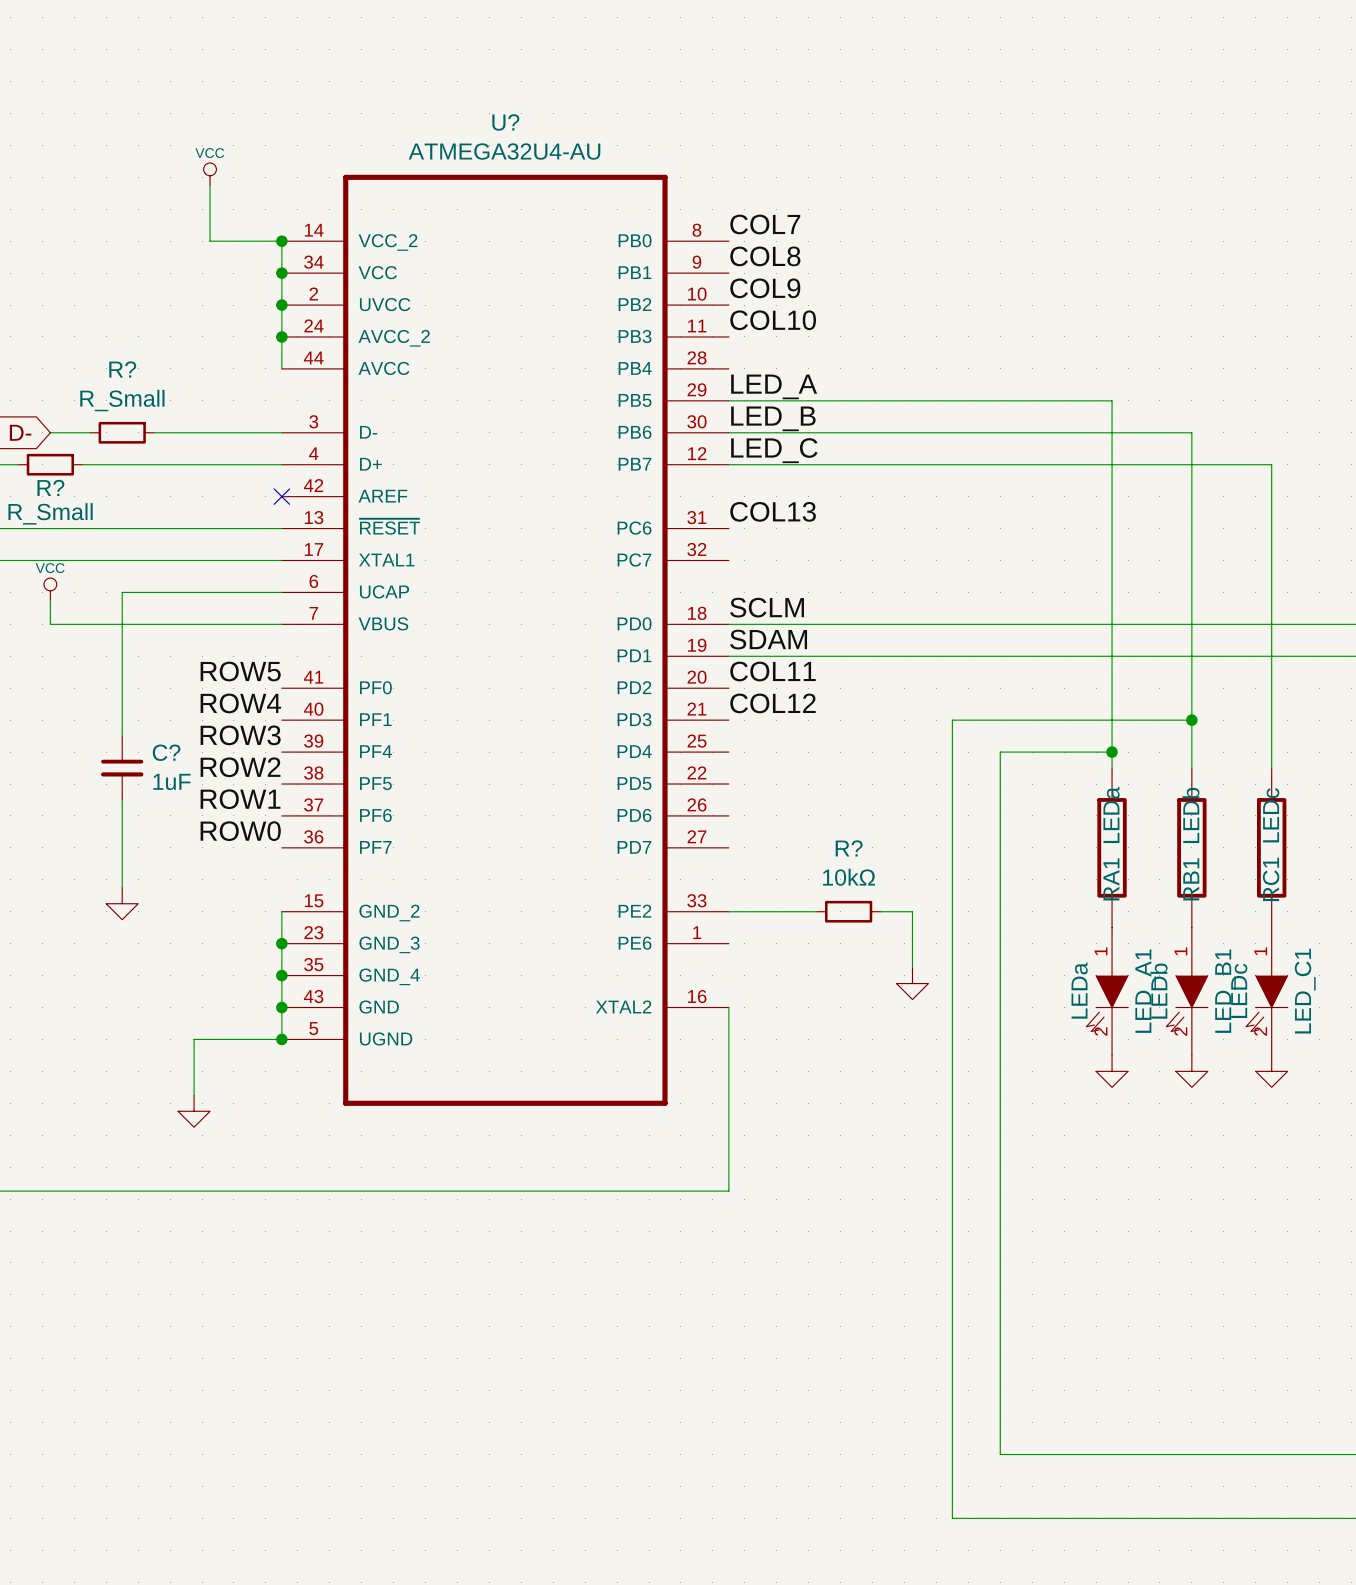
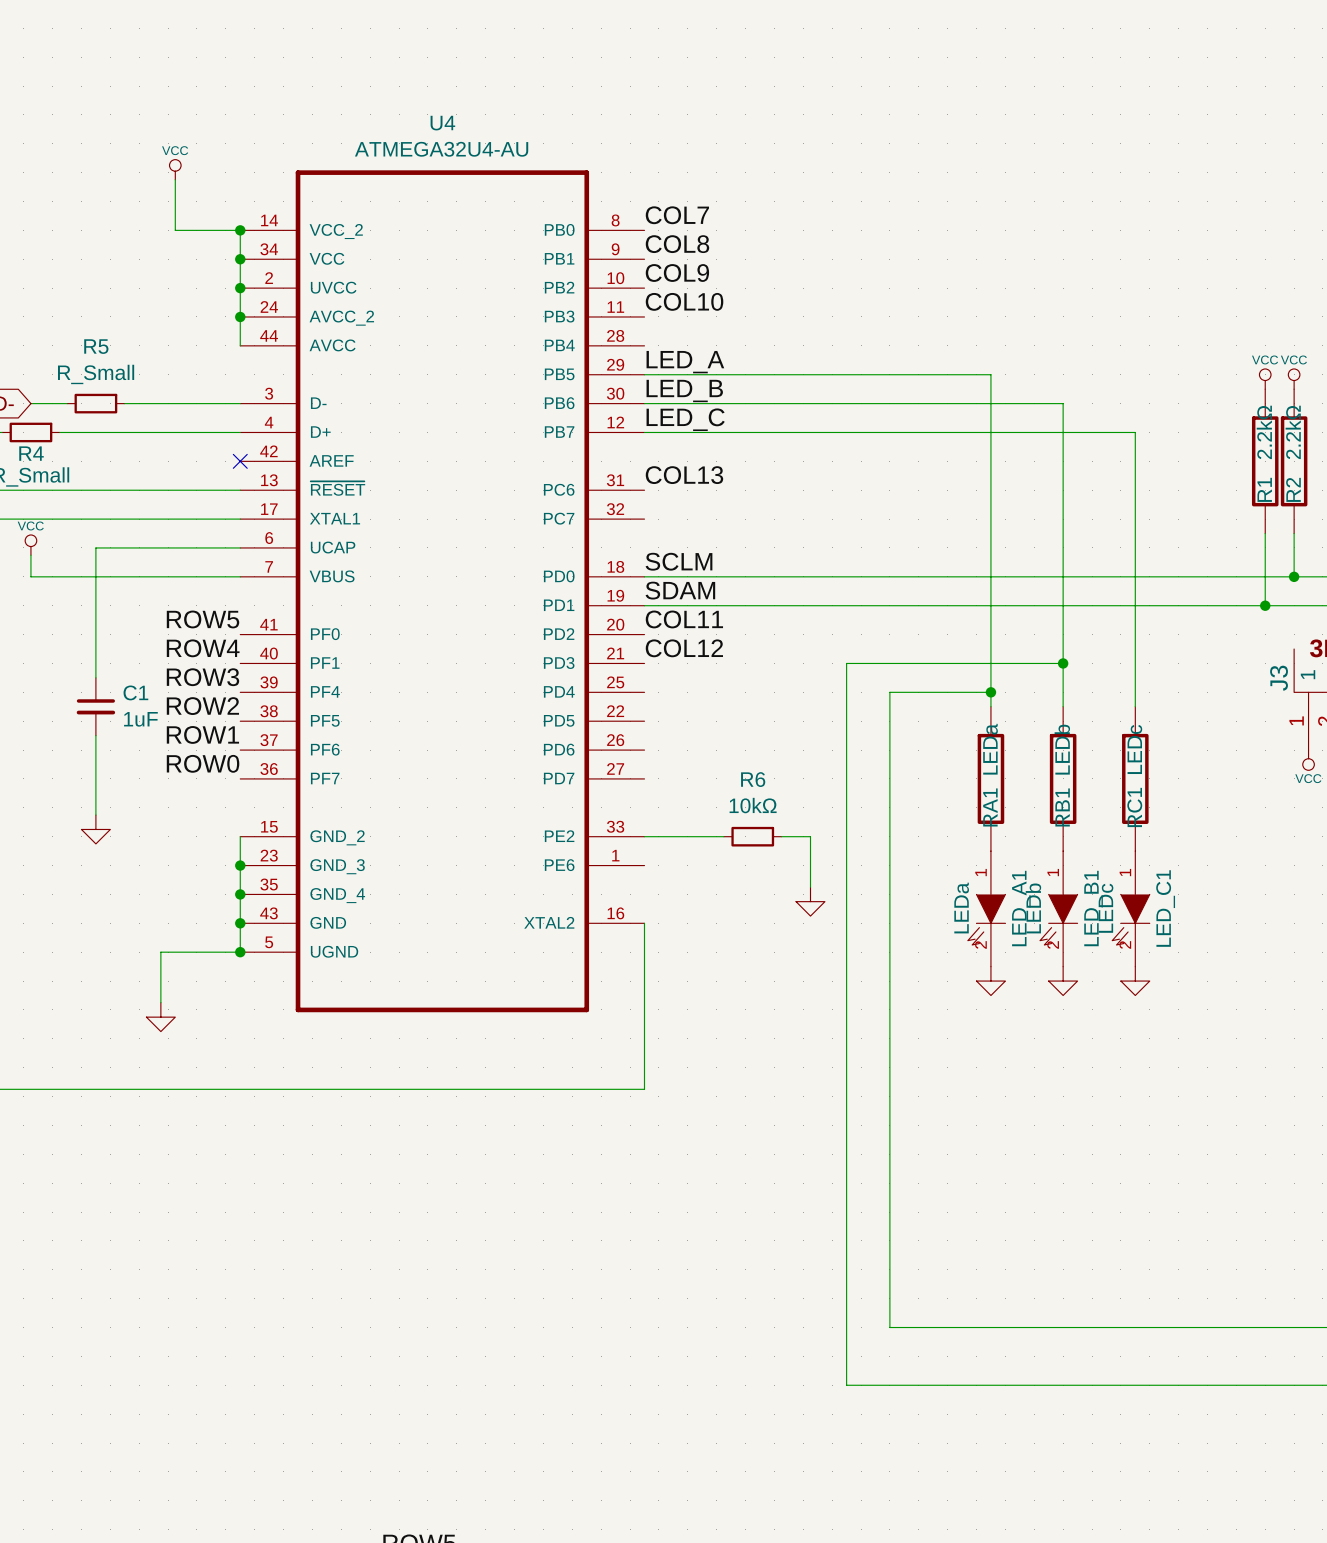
U? name: U? (505, 122) -> U4 (442, 123)
R? name: R? (122, 369) -> R5 (96, 346)
R? name: R? (50, 487) -> R4 (31, 453)
C? name: C? (166, 752) -> C1 (135, 692)
R? name: R? (849, 848) -> R6 (753, 779)

